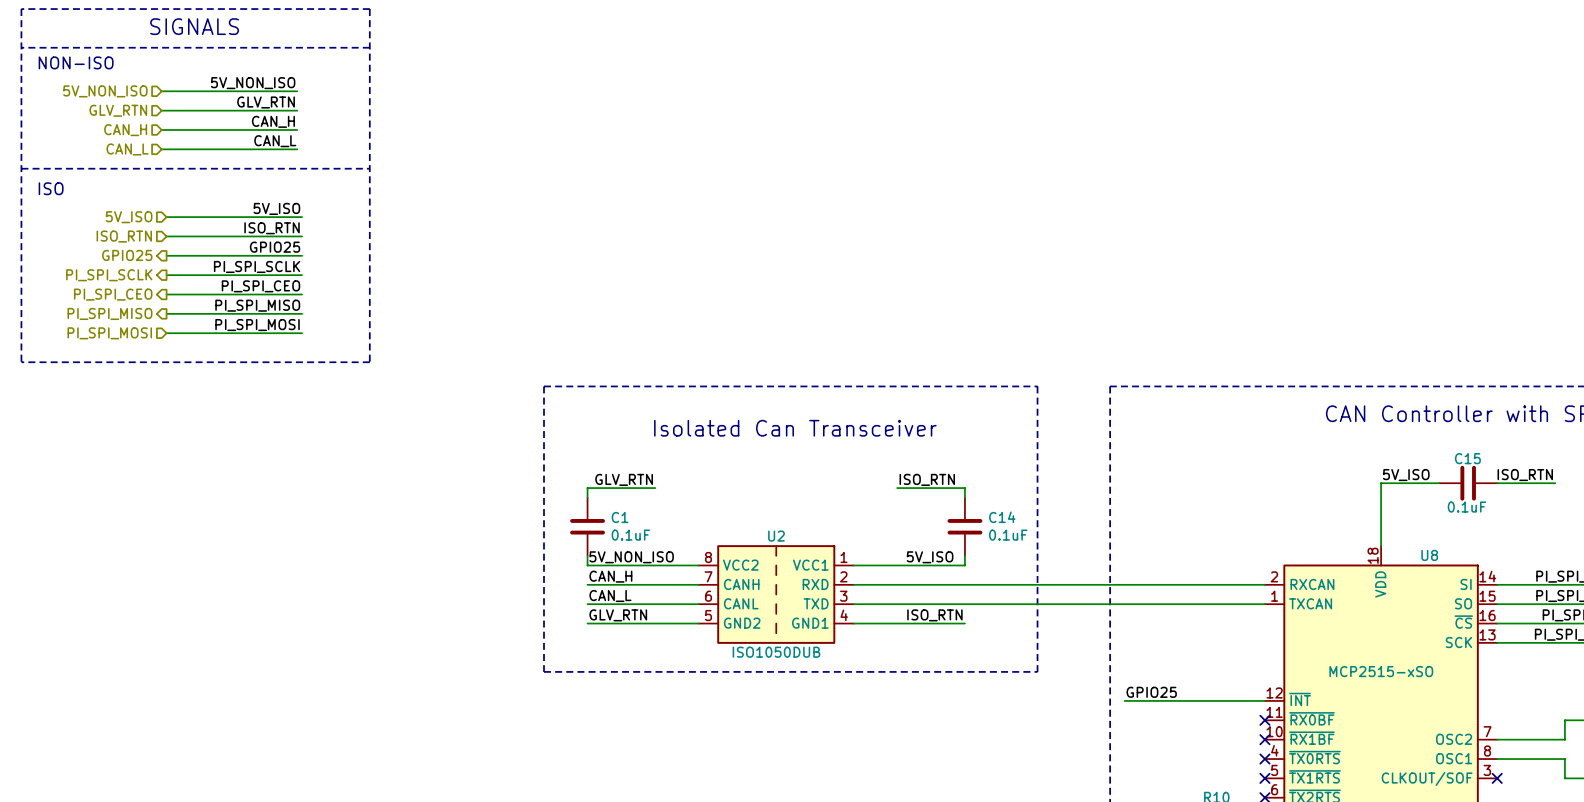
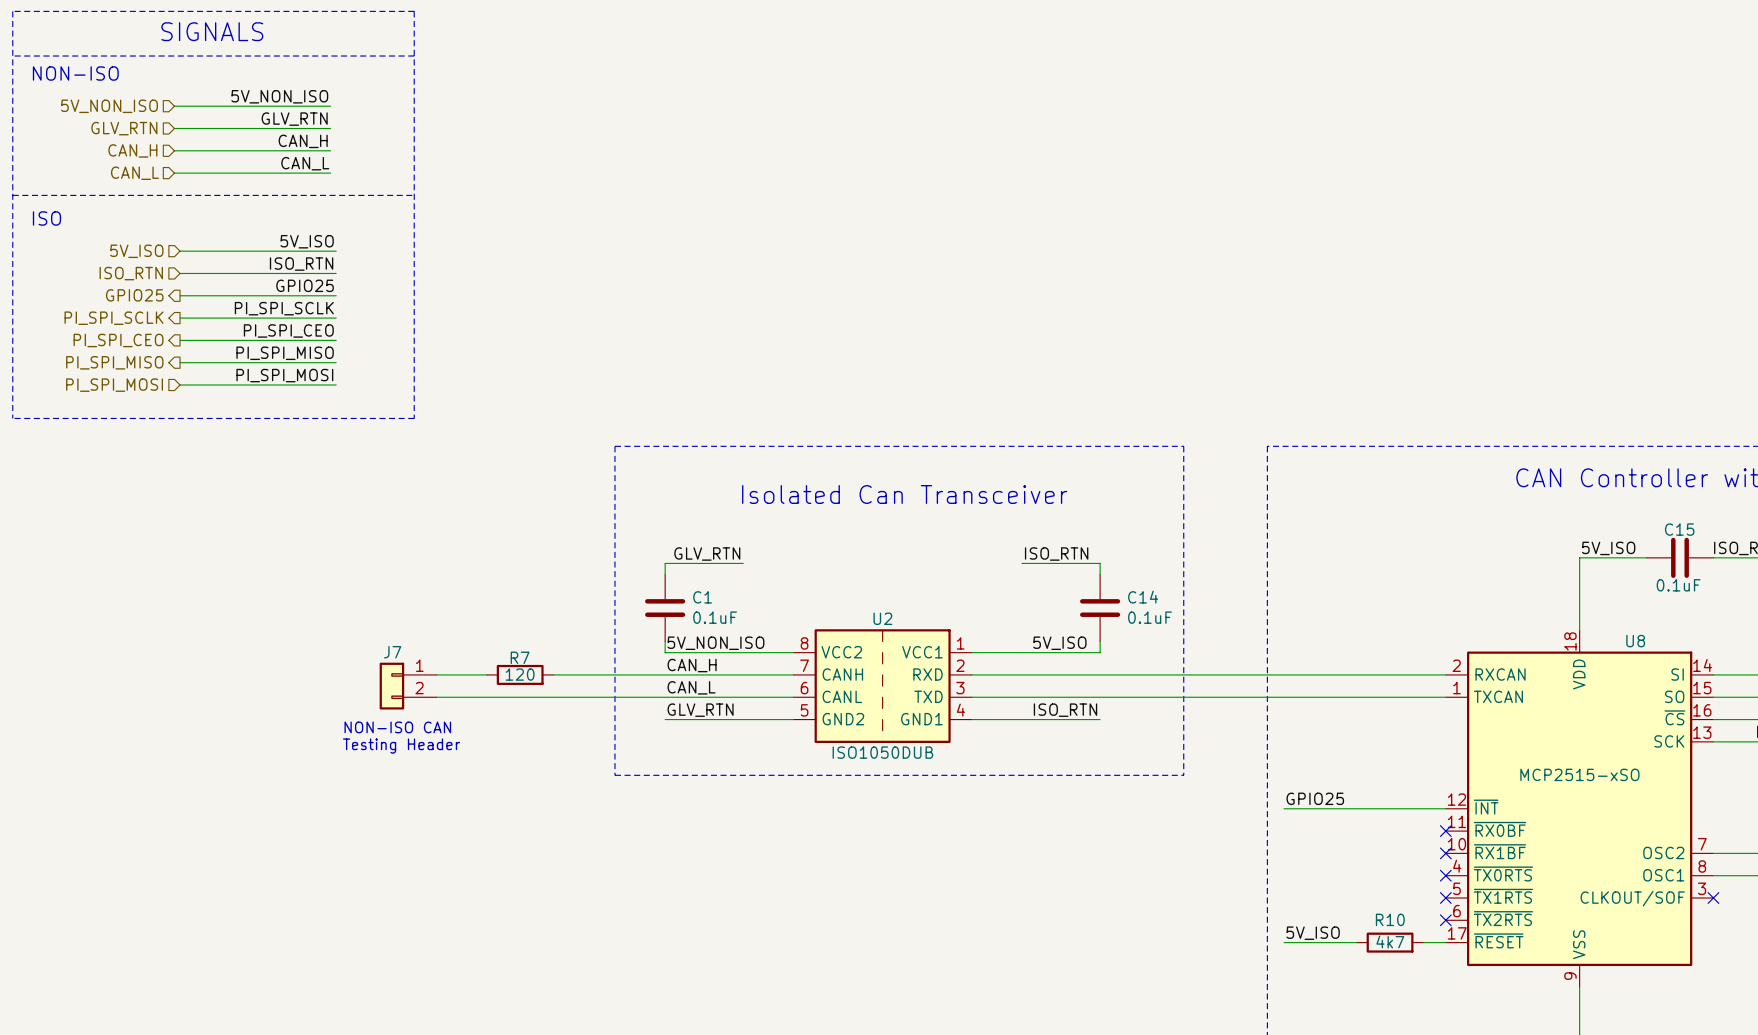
wire: none -> (436, 674) (486, 674)
R7: none -> 120 (520, 674)
wire: none -> (553, 674) (665, 674)
J7: none -> (408, 686)
wire: none -> (436, 697) (665, 697)
text: none -> NON-ISO CAN (397, 727)
text: none -> Testing Header (401, 746)

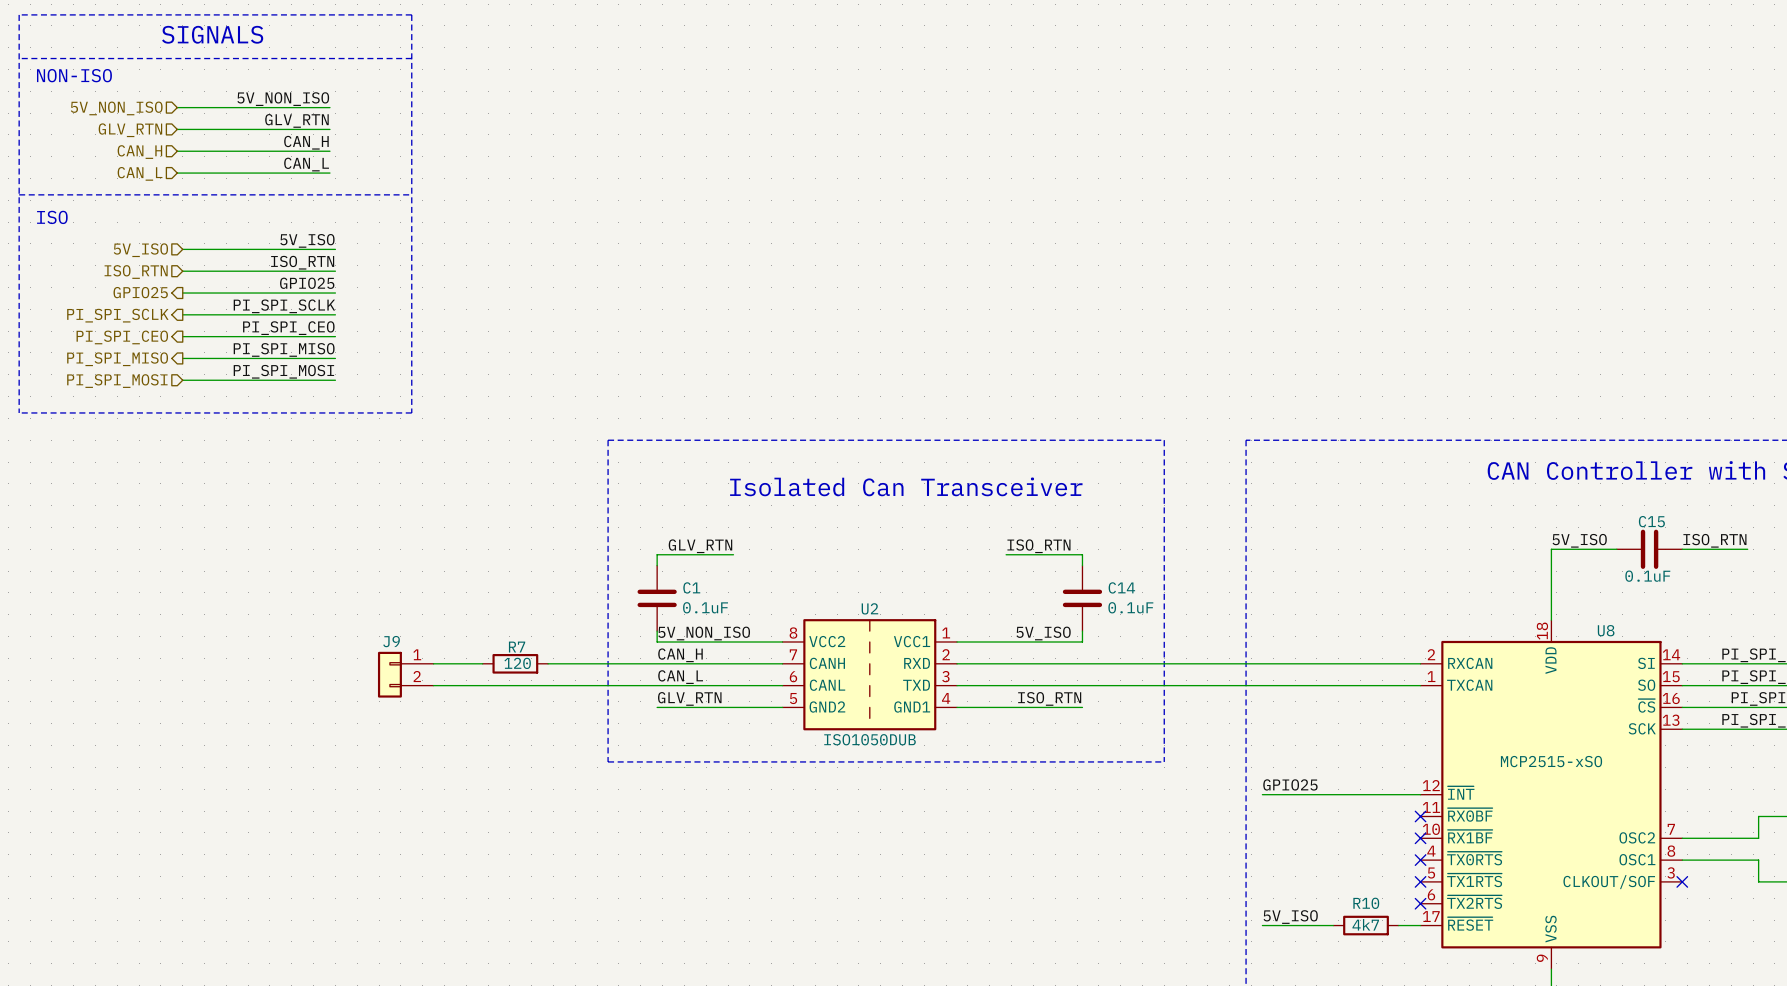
J7 name: J7 (392, 652) -> J9 (391, 641)
text: NON-ISO CAN (397, 727) -> none
text: Testing Header (401, 746) -> none

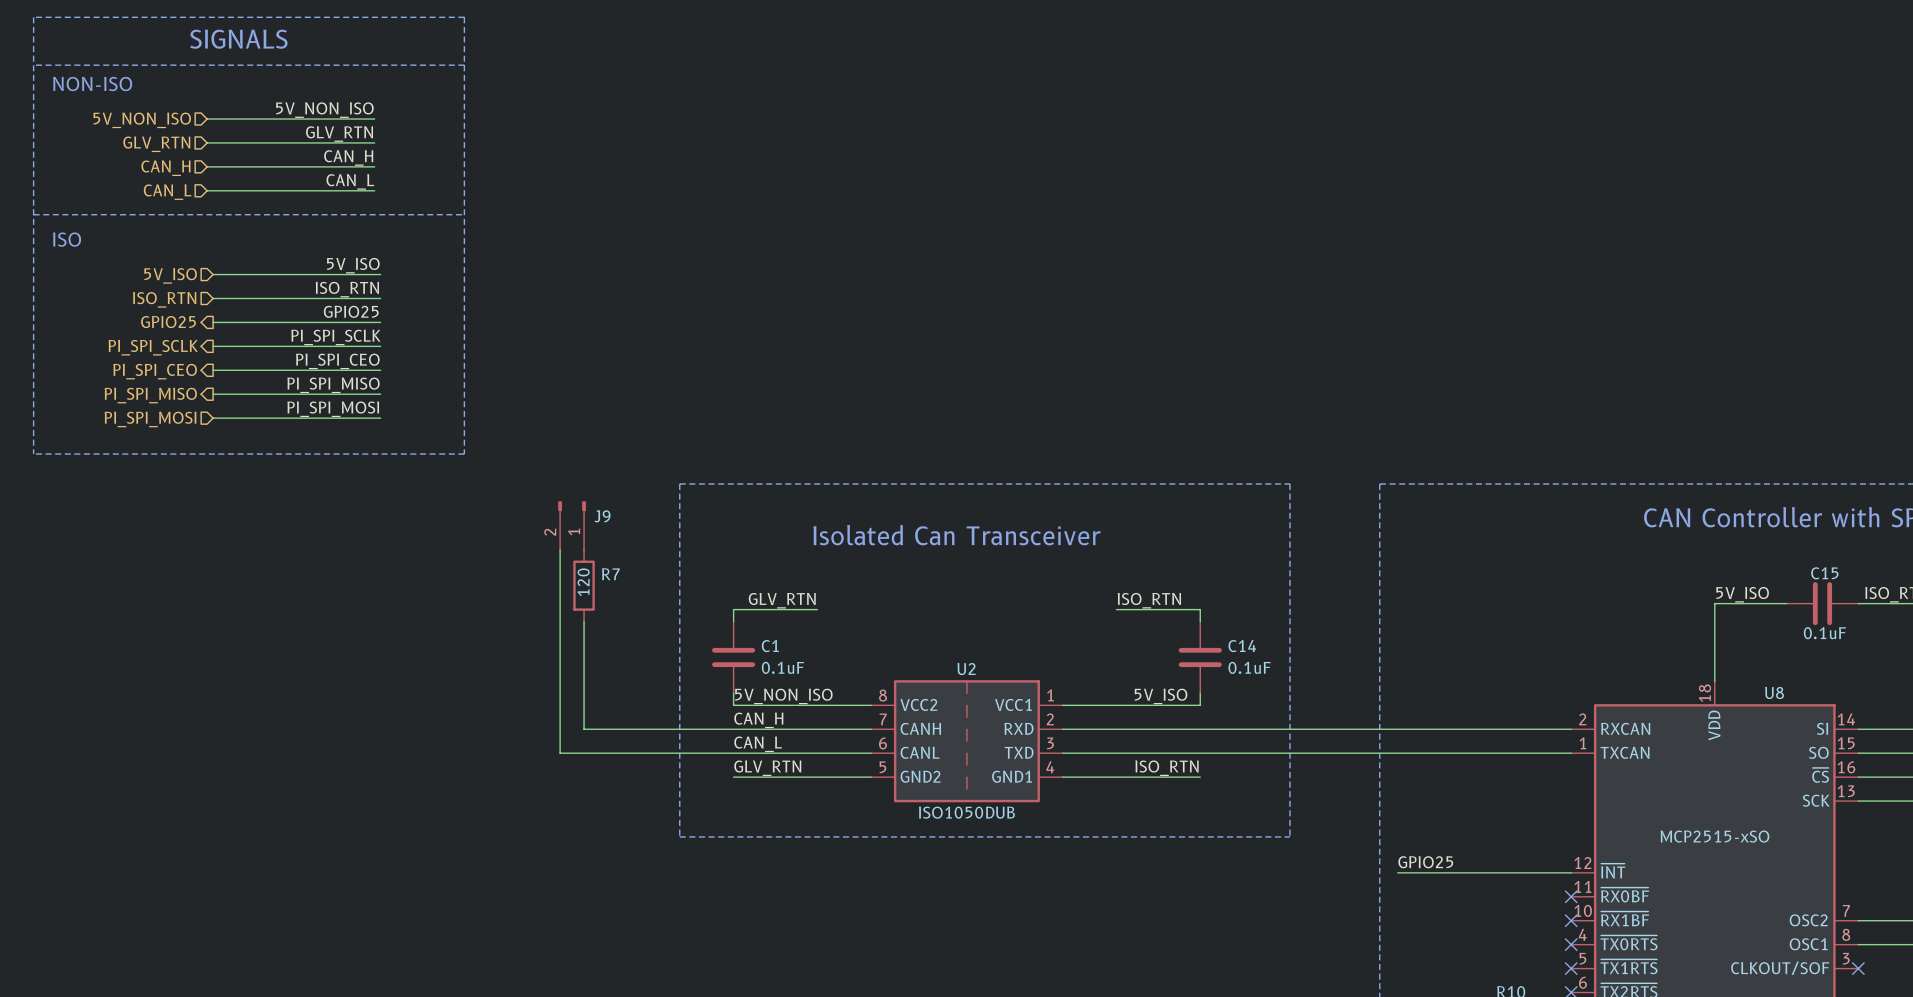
wire: none -> (584, 621) (584, 729) (613, 729)
J9 name position: J9 (391, 641) -> J9 (602, 516)
J9 symbol: [377, 651, 434, 698] -> [558, 501, 586, 550]
wire: (433, 663) (482, 663) -> none
R7 rotation: 0° (515, 663) -> 90° clockwise (584, 585)
R7 position: (515, 663) -> (584, 585)
wire: (433, 685) (499, 685) -> (560, 549) (560, 753)

